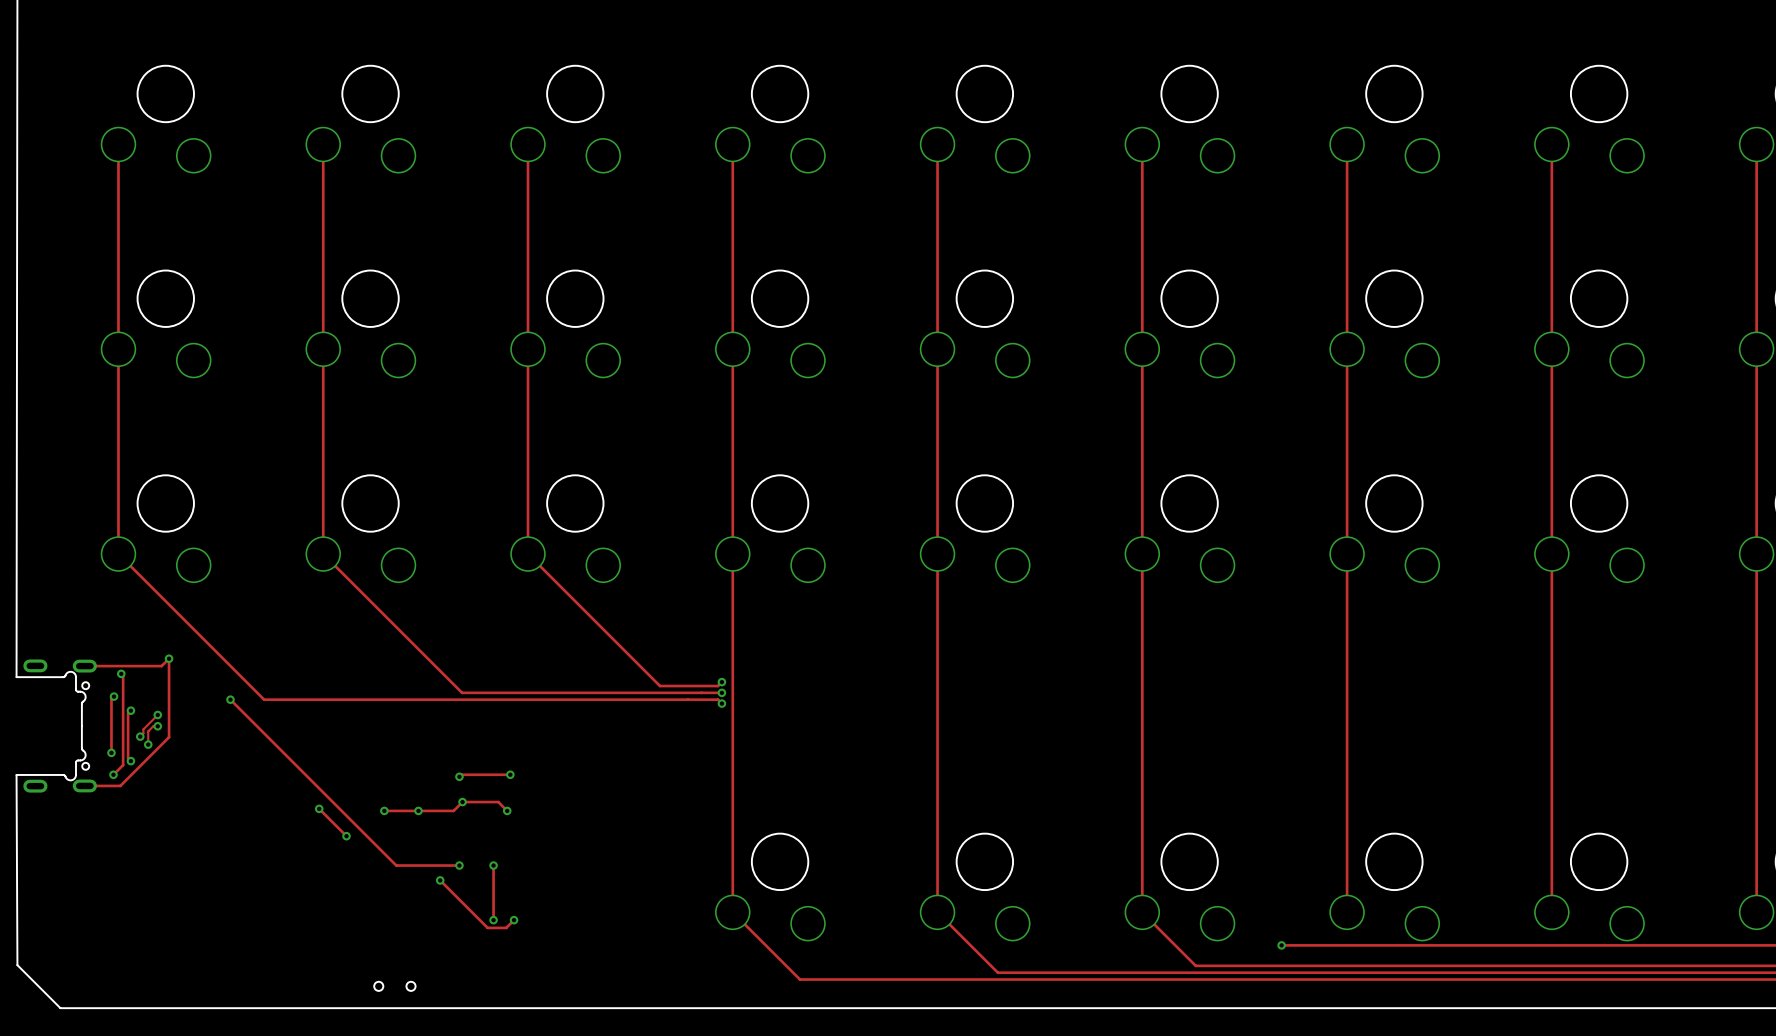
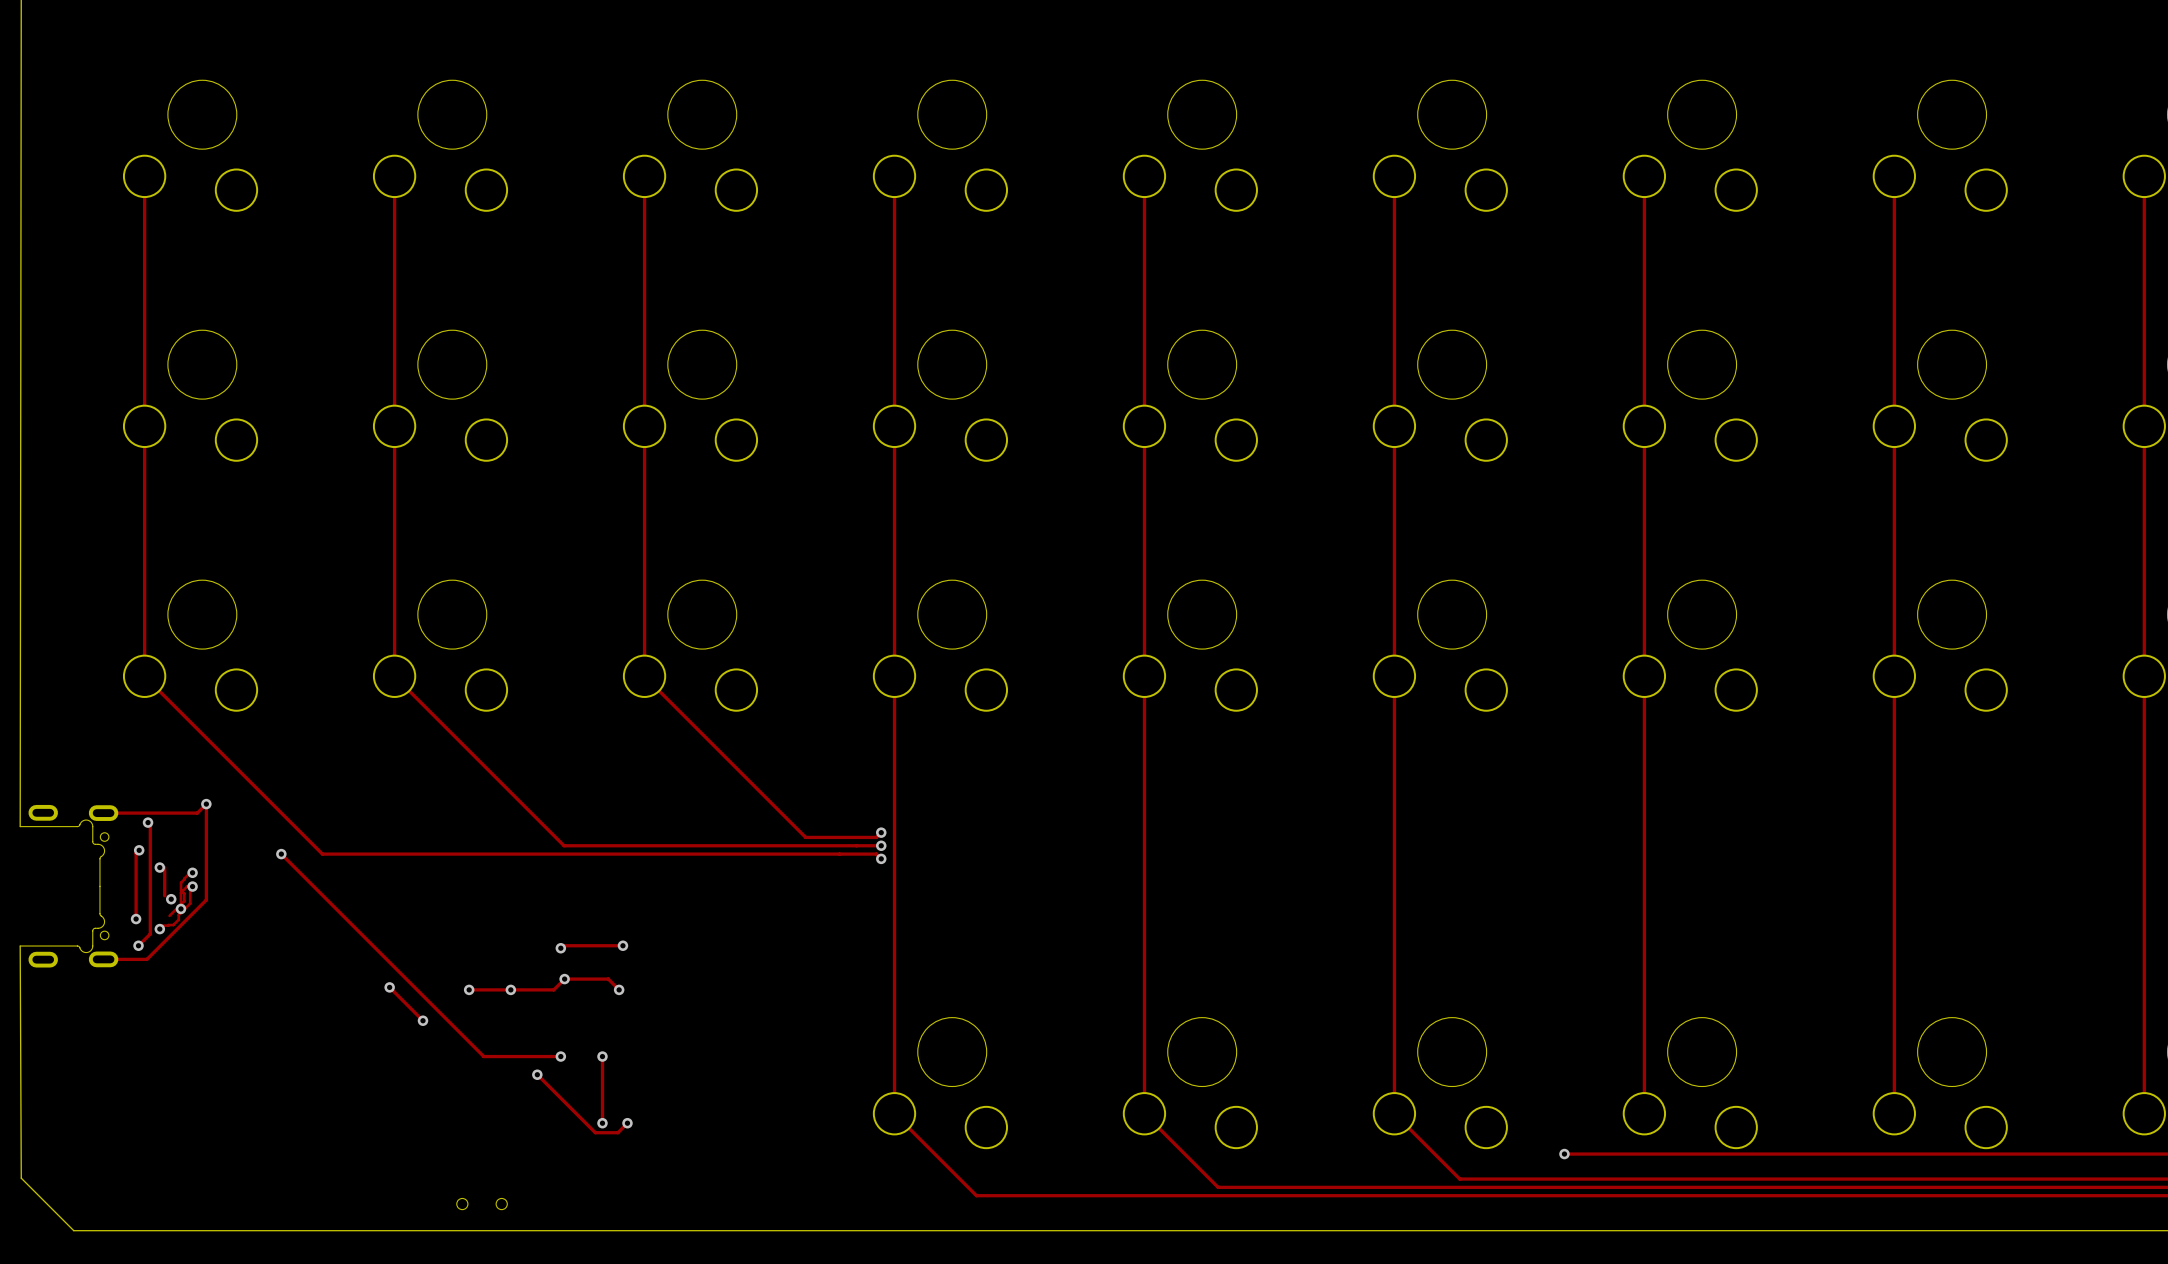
track: (130, 710) (128, 713) (128, 758) (130, 761) -> none
track: none -> (164, 867) (164, 895)
track: none -> (190, 872) (181, 882) (184, 901) (169, 915)
track: (157, 714) (143, 729) (143, 733) (140, 736) -> none
track: none -> (190, 886) (190, 903) (178, 915) (178, 919) (173, 925) (159, 925)

